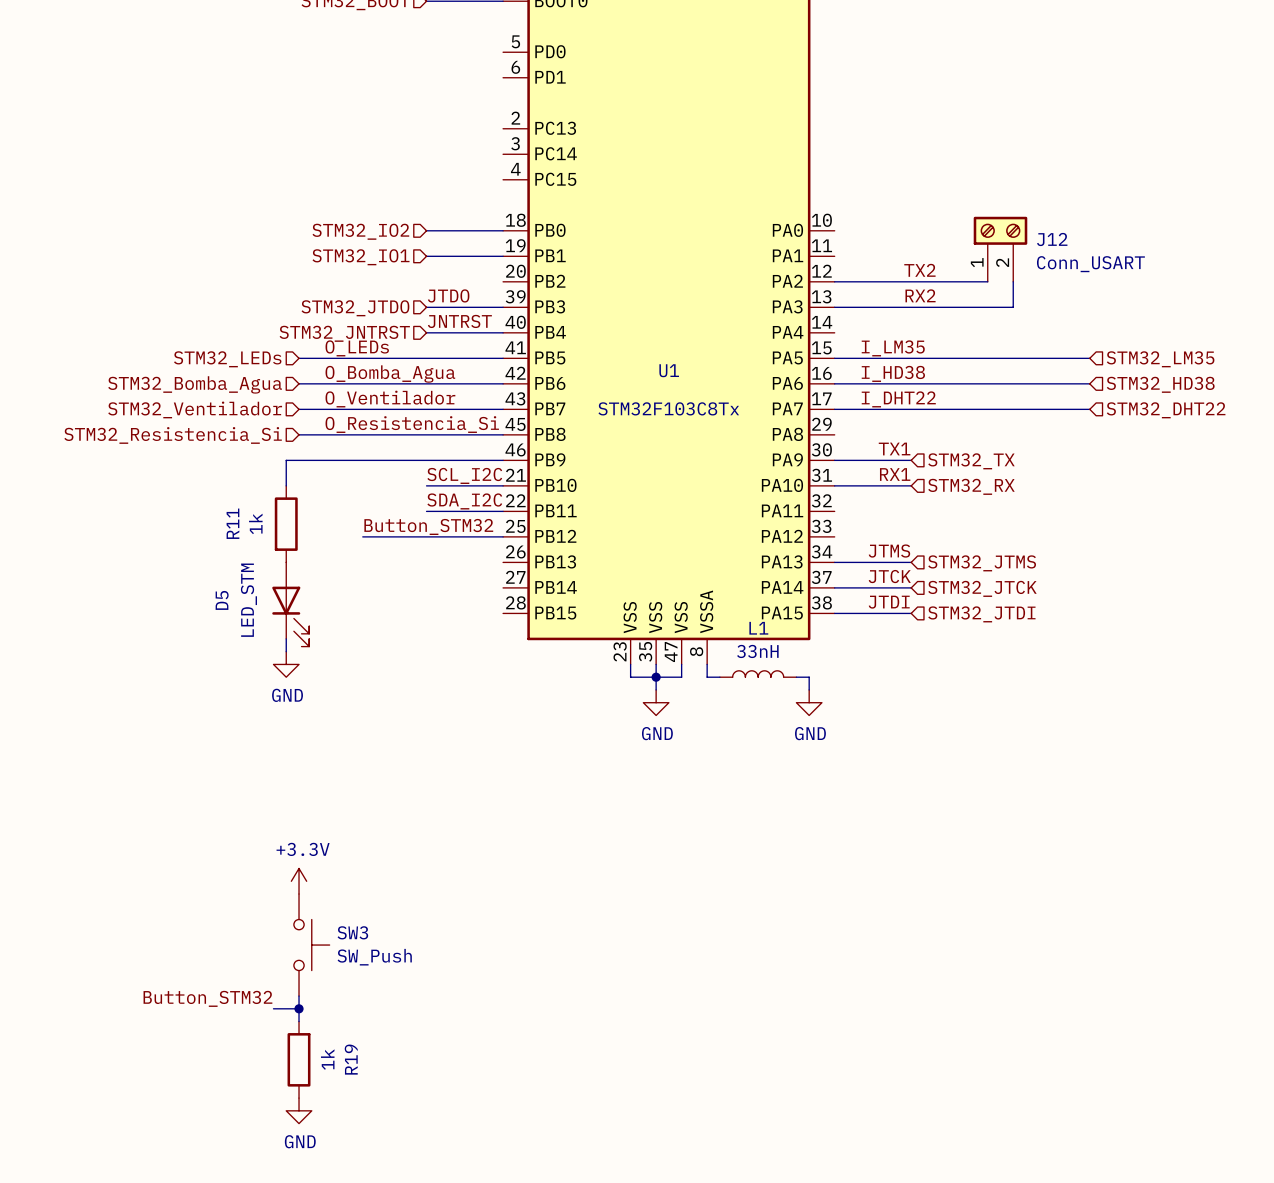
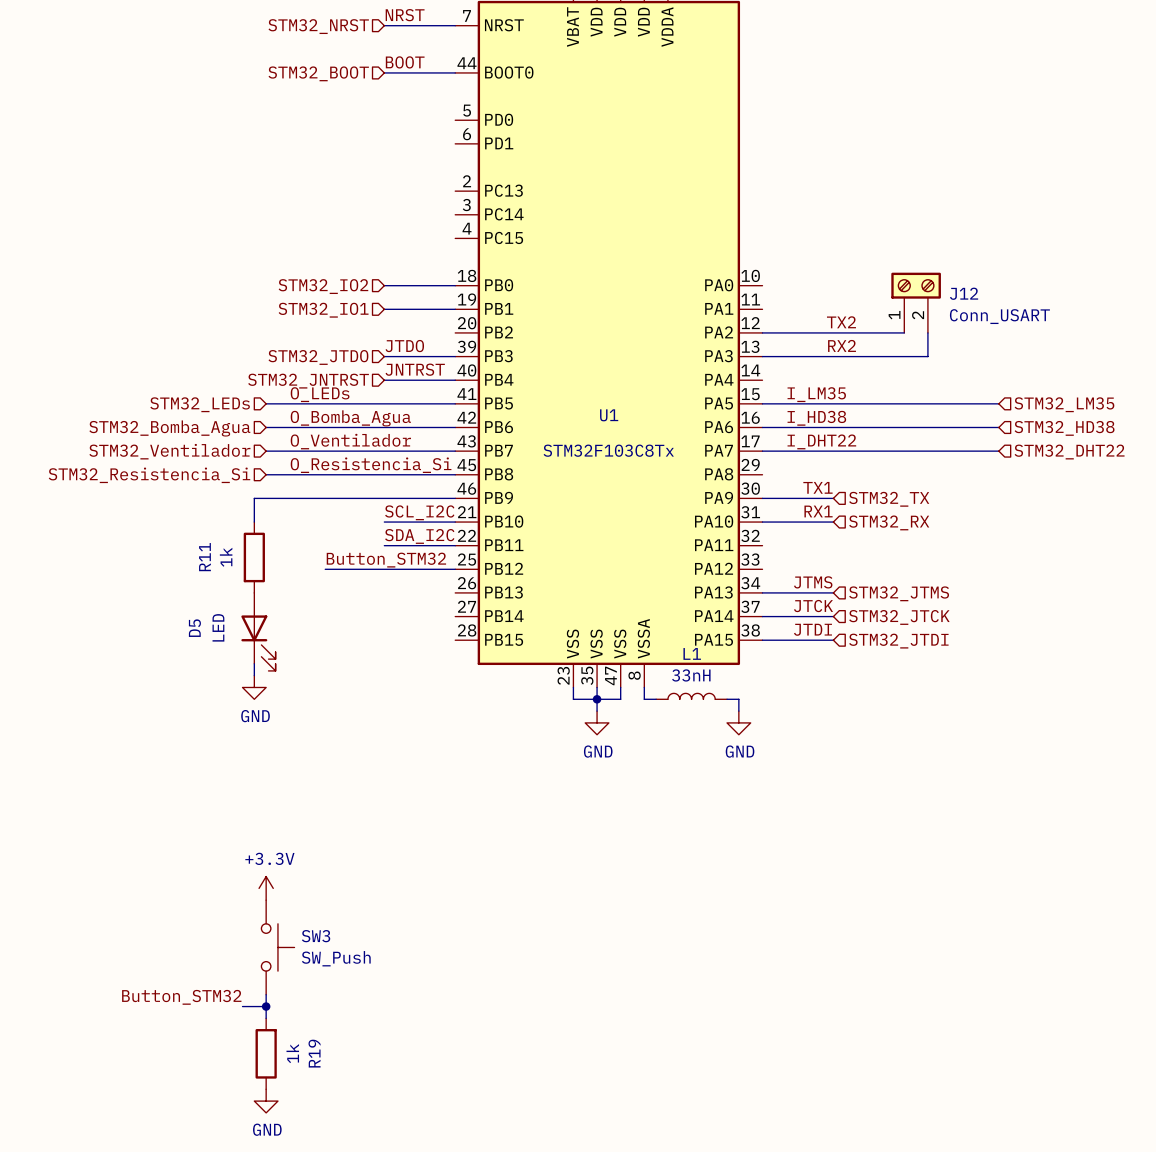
D5 value: LED_STM (248, 600) -> LED (218, 627)

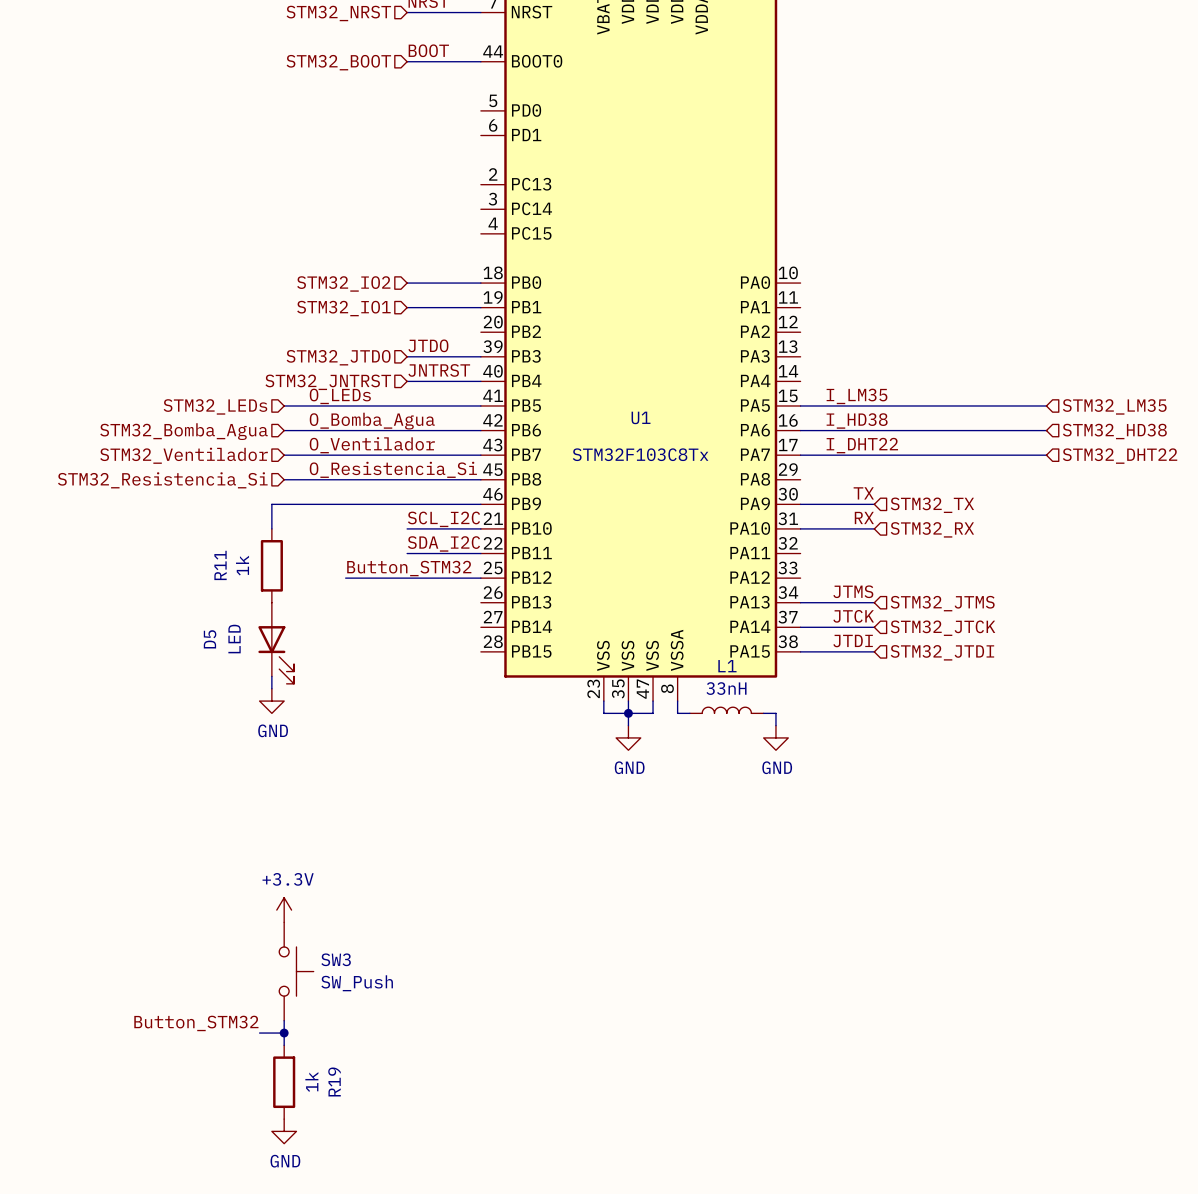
J12: Conn_USART (916, 302) -> none
label: TX2 (841, 322) -> none
wire: (762, 332) (904, 332) -> none
wire: (927, 332) (927, 356) (762, 356) -> none
label: RX2 (842, 345) -> none
label: TX1 (817, 487) -> TX (863, 493)
label: RX1 (818, 511) -> RX (864, 517)

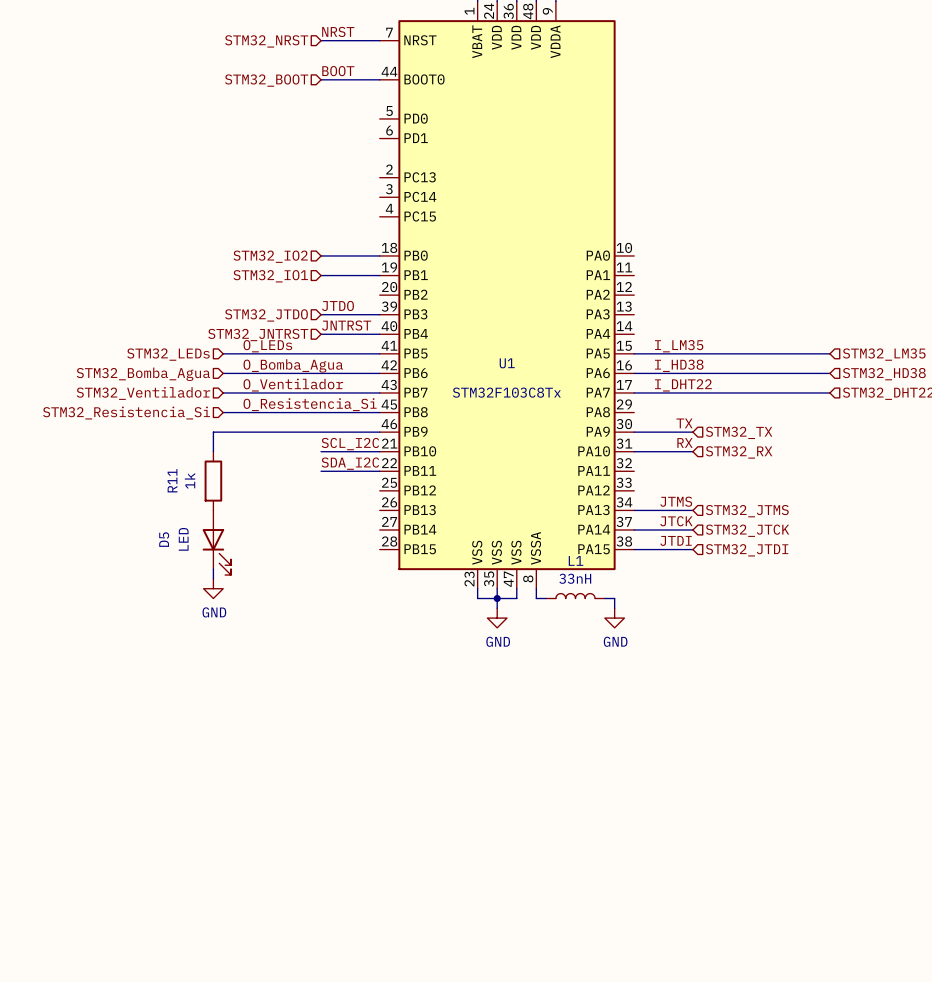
label: Button_STM32 (409, 568) -> none
wire: (345, 578) (480, 578) -> none
power symbol: +3.3V (284, 910) -> none
SW3: SW_Push (296, 971) -> none
wire: (284, 1020) (284, 1045) -> none
label: Button_STM32 (196, 1023) -> none
wire: (259, 1033) (284, 1033) -> none
junction: (284, 1033) -> none
R19: 1k (284, 1082) -> none
power symbol: GND (284, 1131) -> none

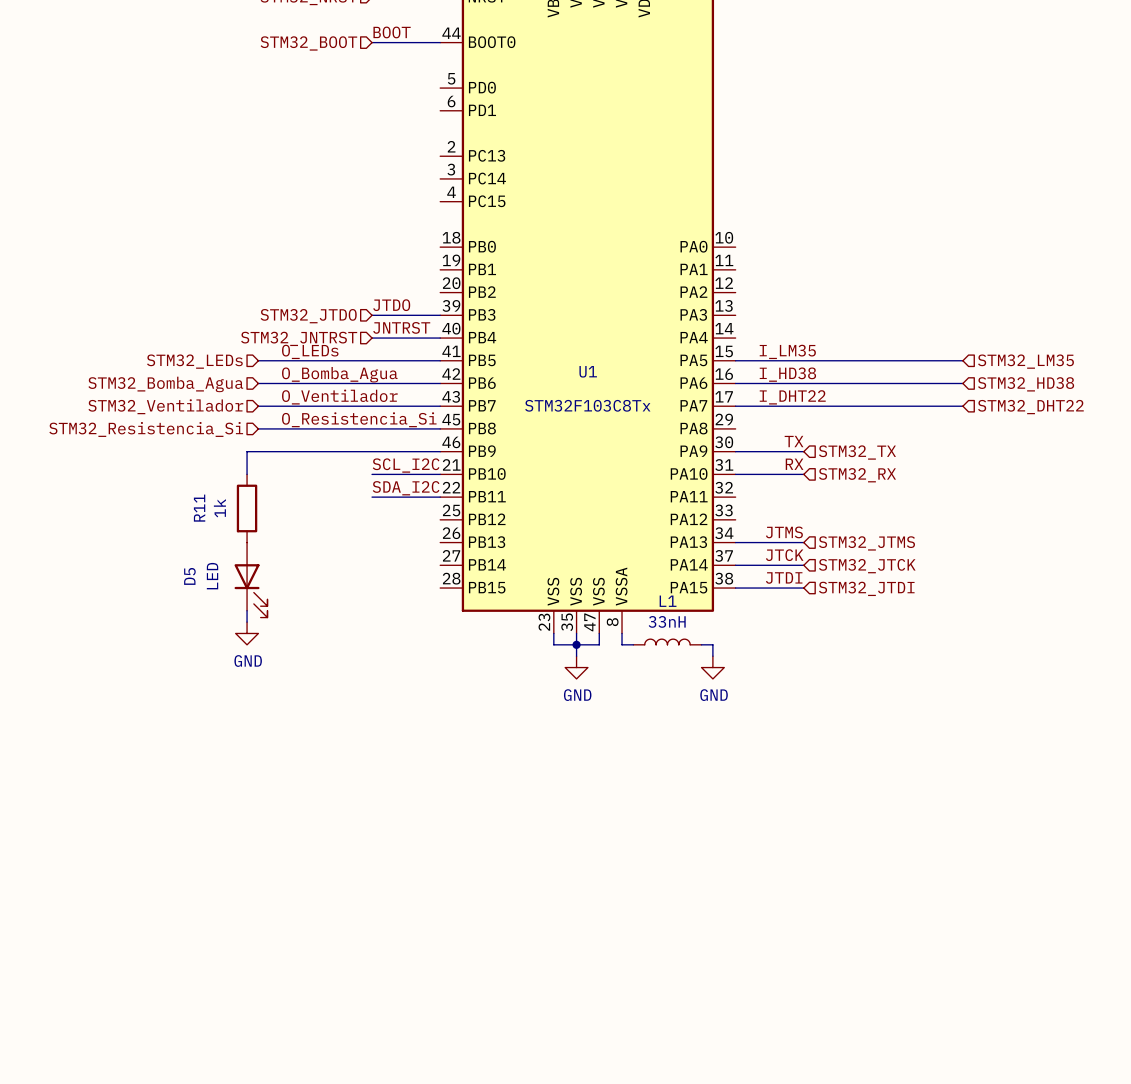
wire: (321, 255) (379, 255) -> none
hierarchical label: STM32_IO2 (270, 256) -> none
wire: (321, 275) (379, 275) -> none
hierarchical label: STM32_IO1 (270, 276) -> none

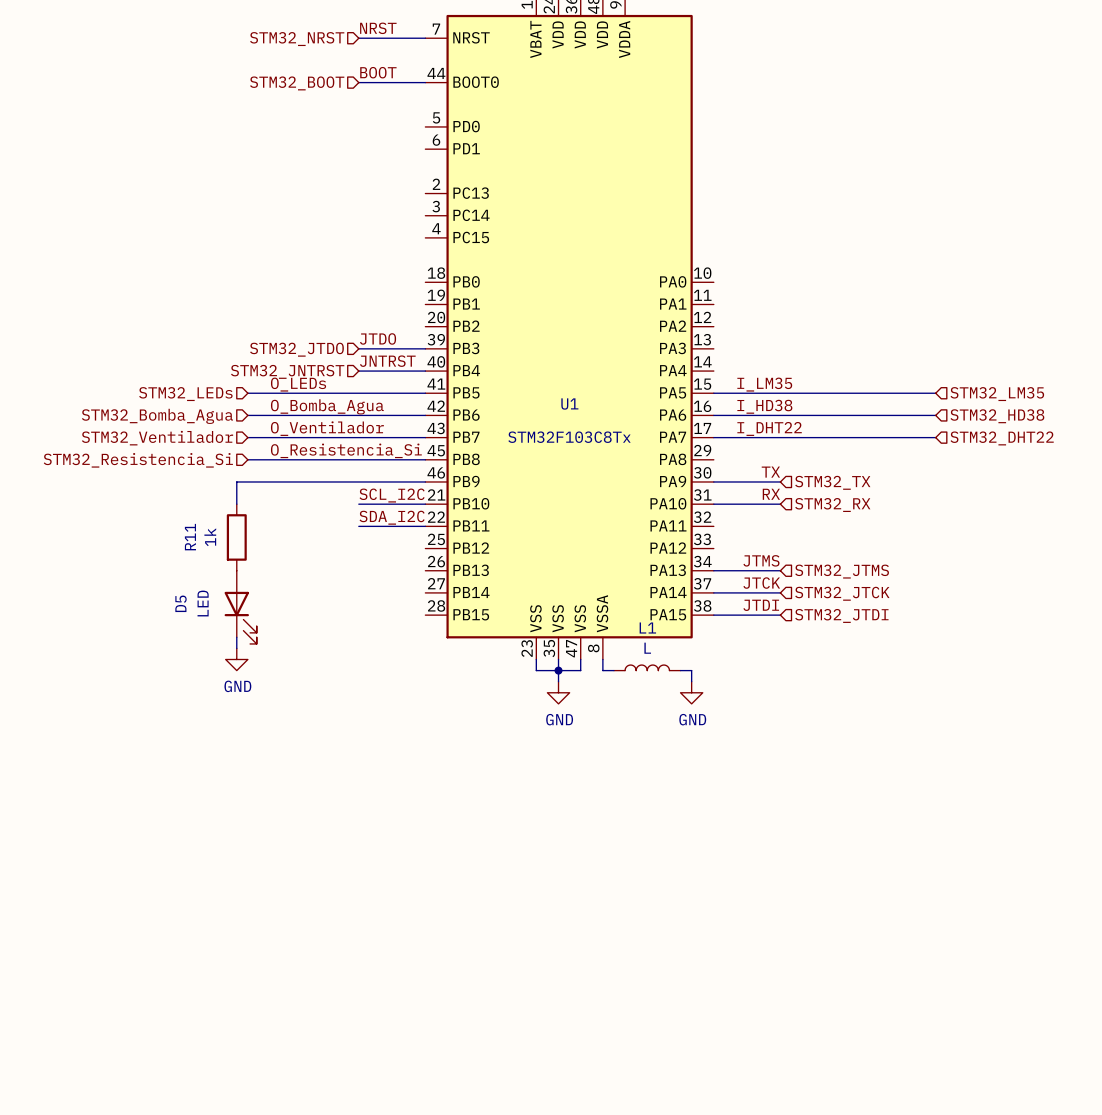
L1 value: 33nH (667, 621) -> L (647, 648)

